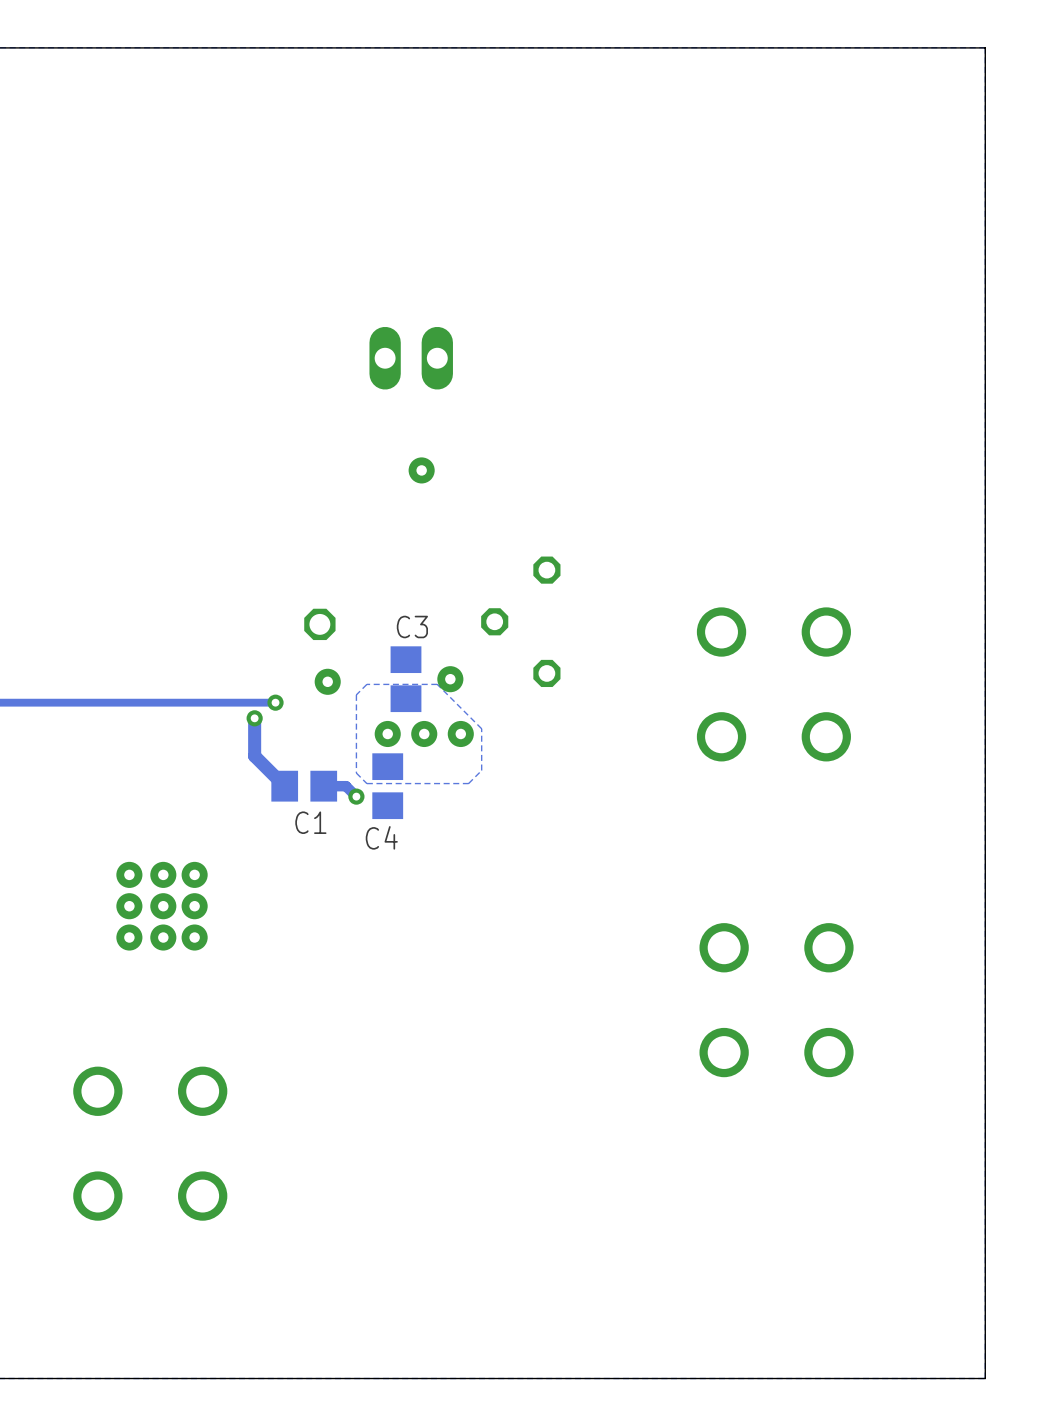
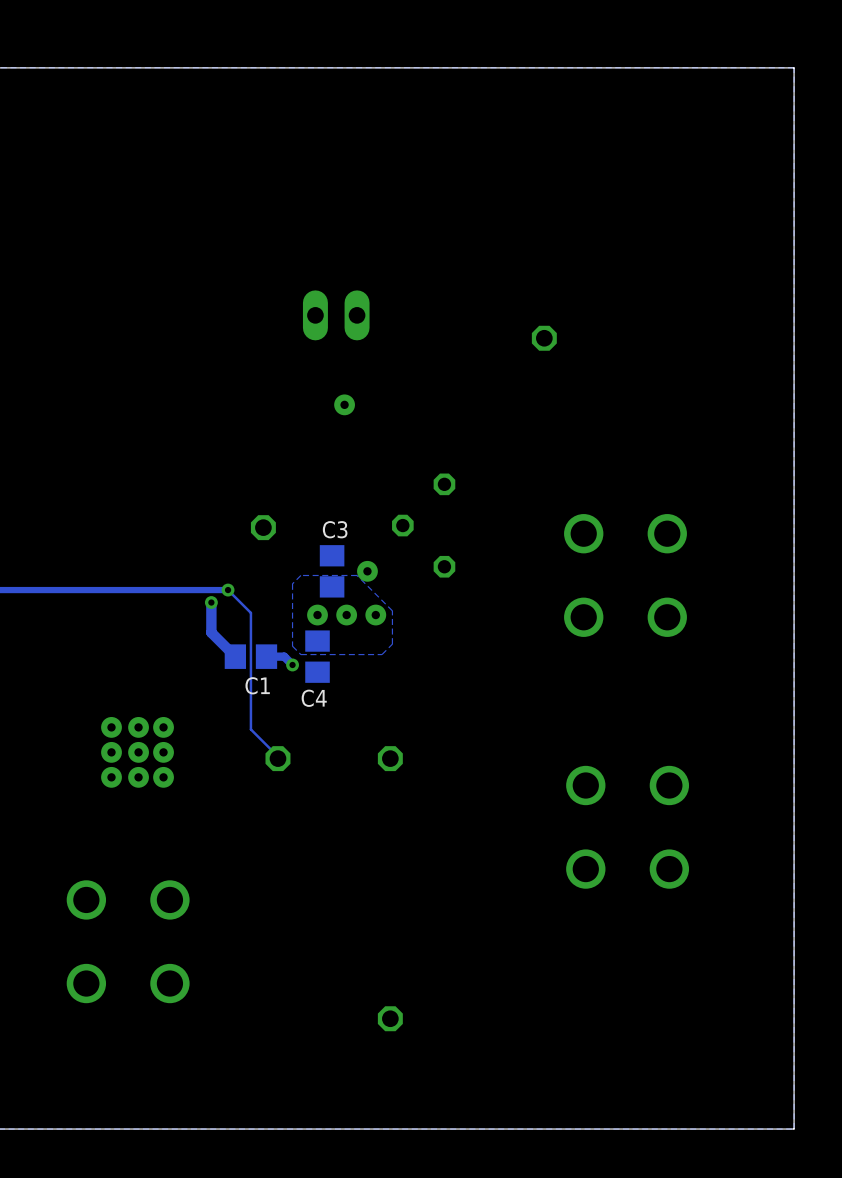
part: none -> (544, 338)
via: (327, 681) -> none
track: none -> (228, 590) (250, 612) (250, 729) (277, 758)
part: none -> (277, 758)
part: none -> (390, 758)
part: none -> (390, 1018)

